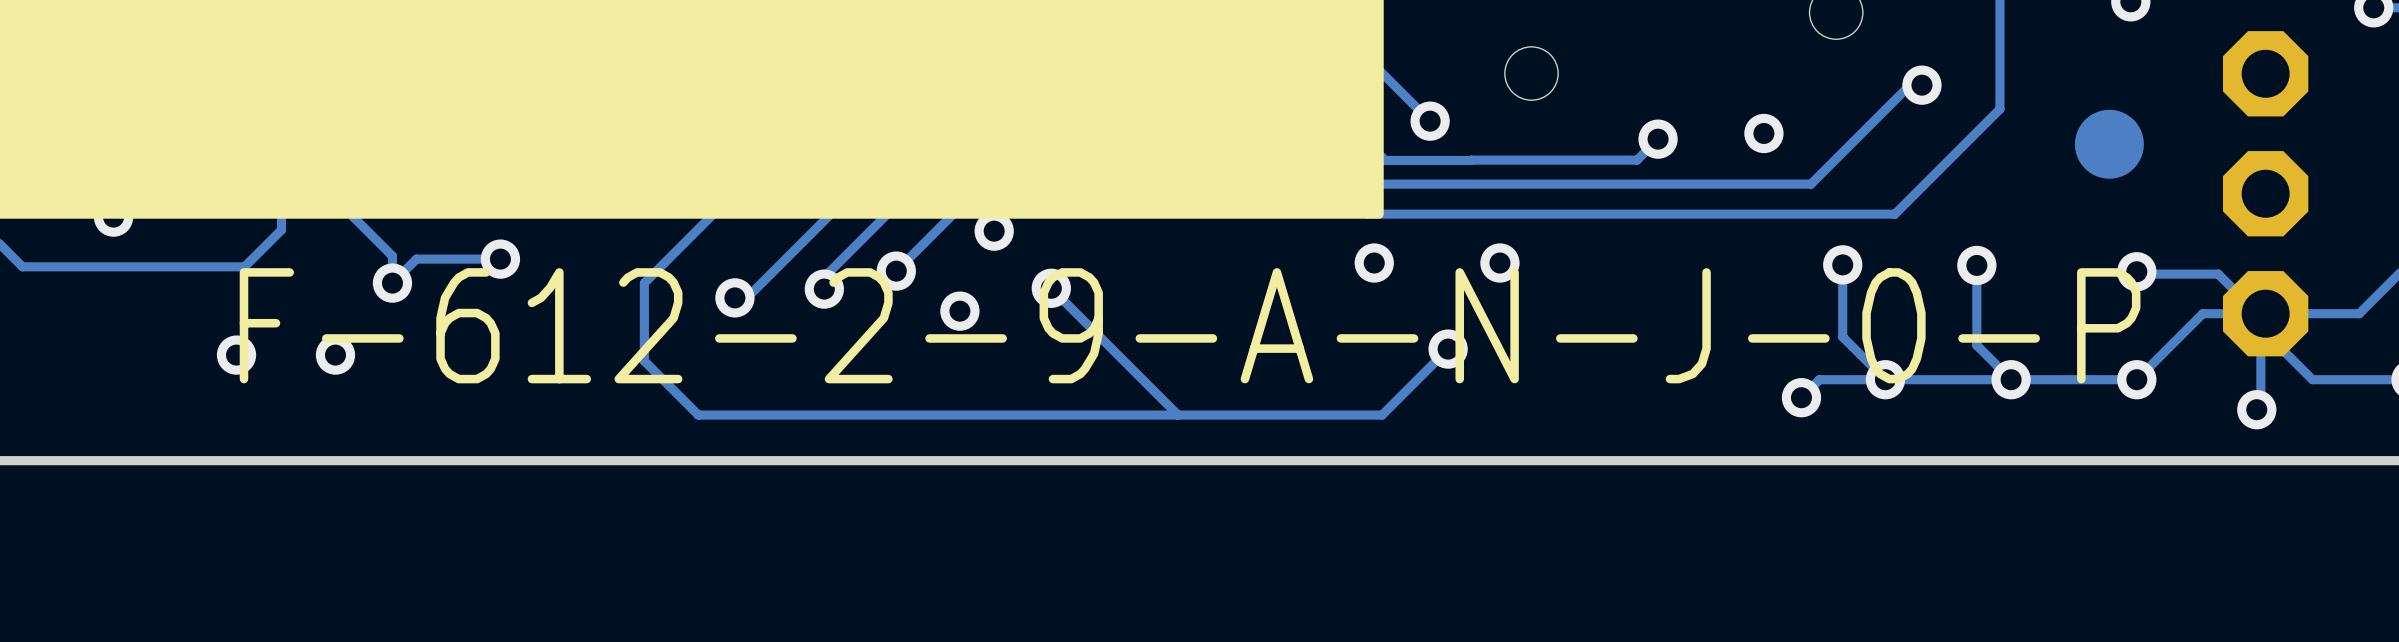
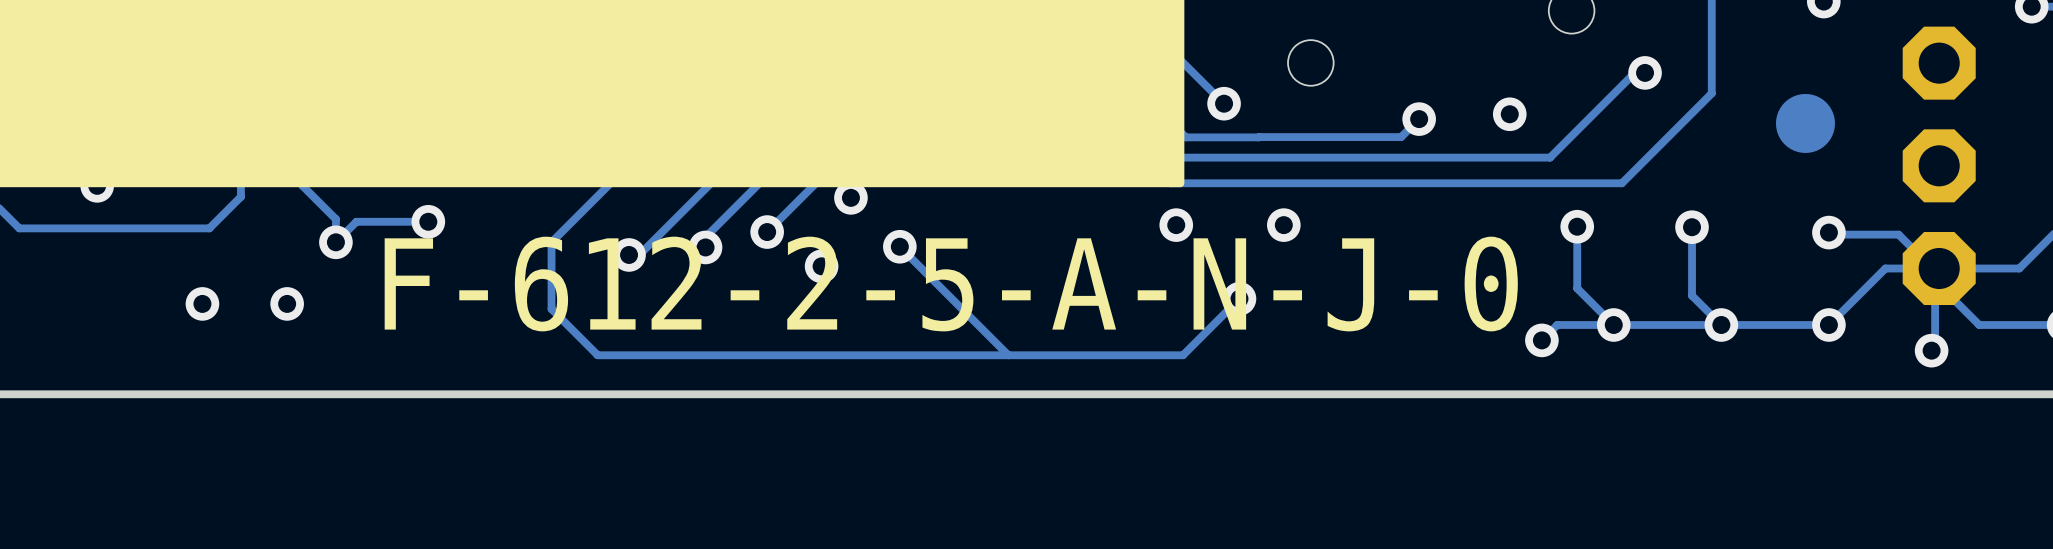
text: F-612-2-9-A-N-J-0-P (1190, 325) -> F-612-2-5-A-N-J-0 (951, 284)

